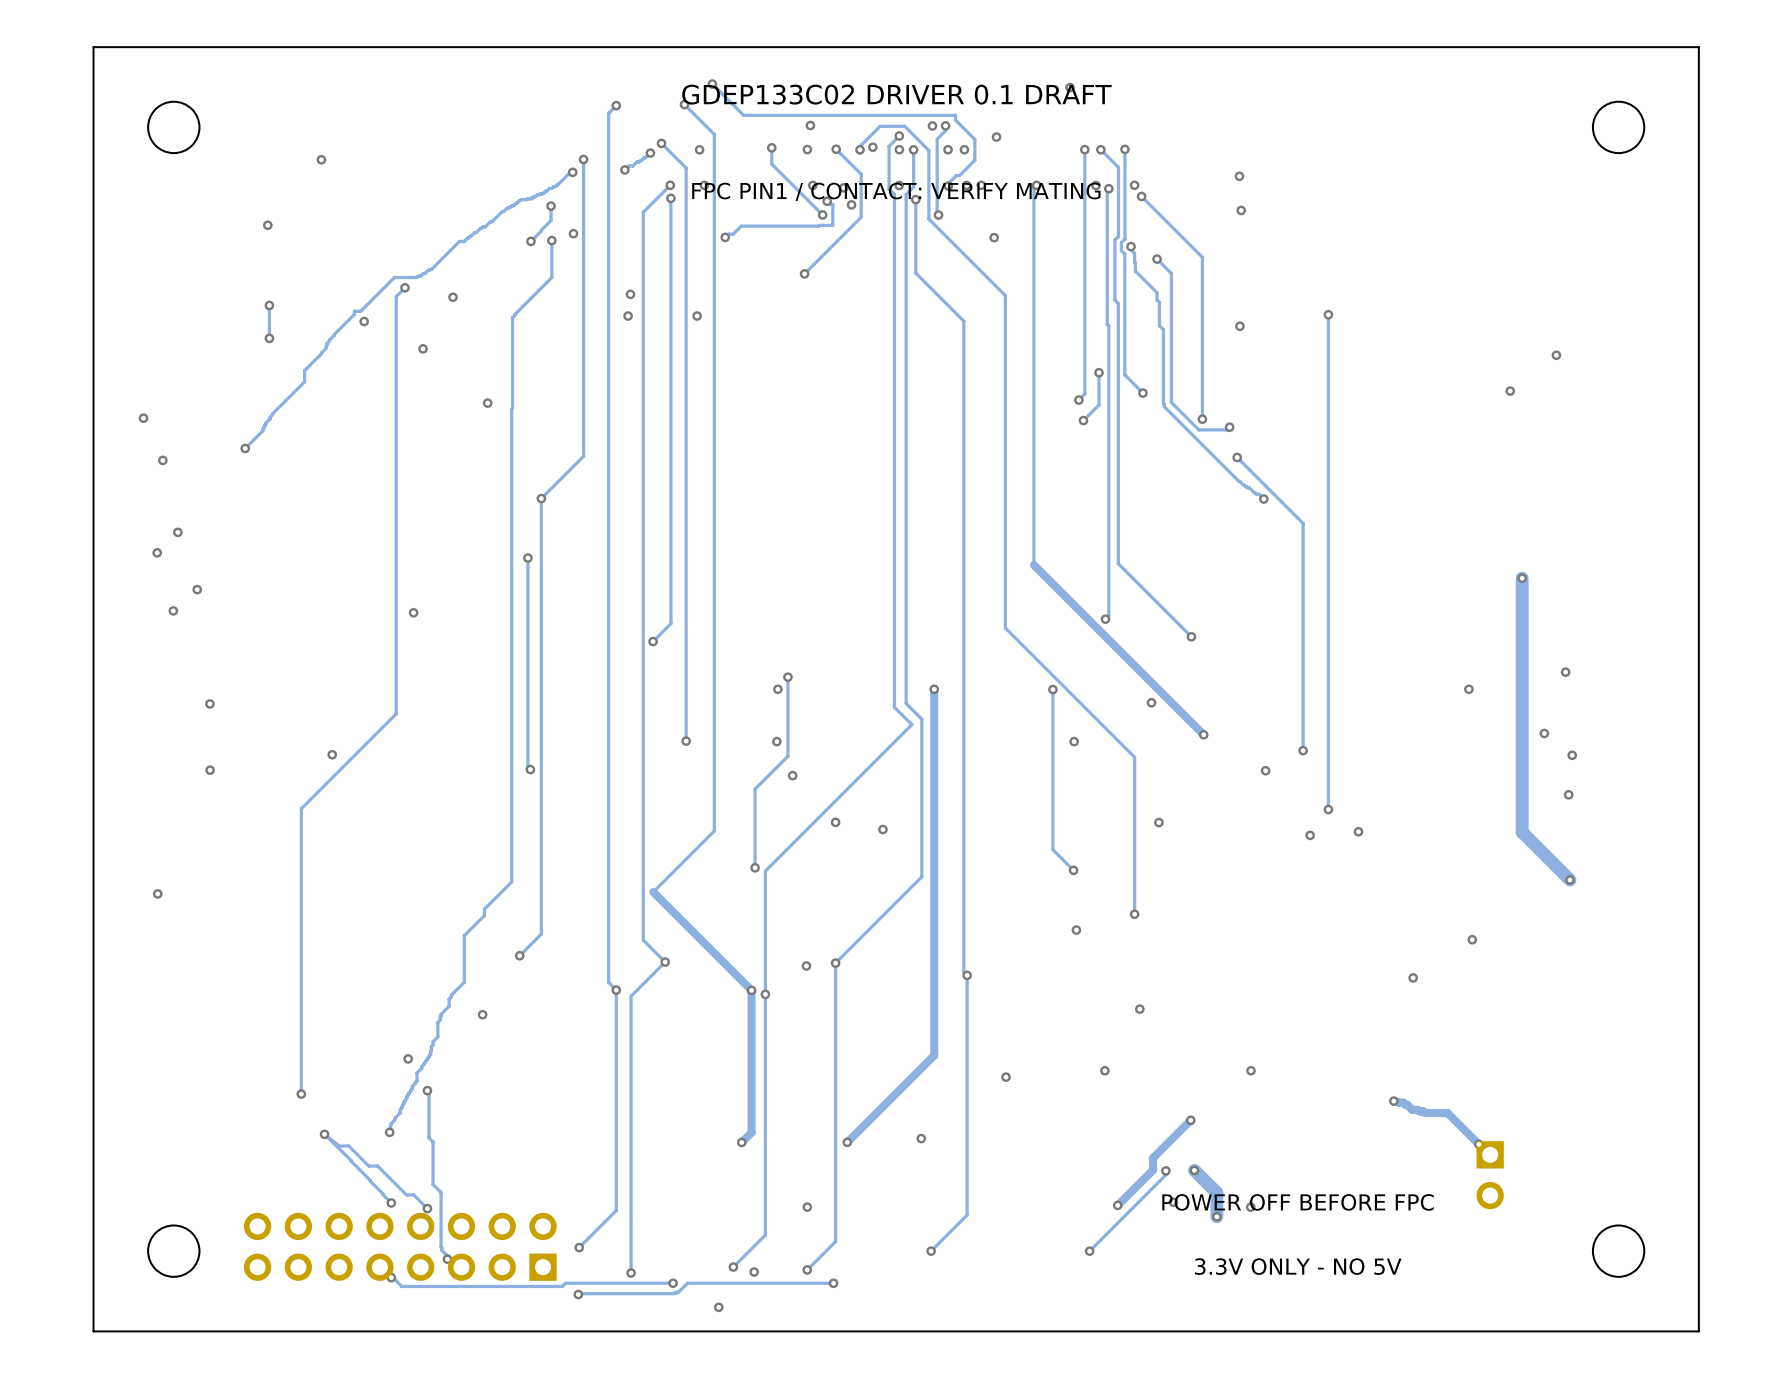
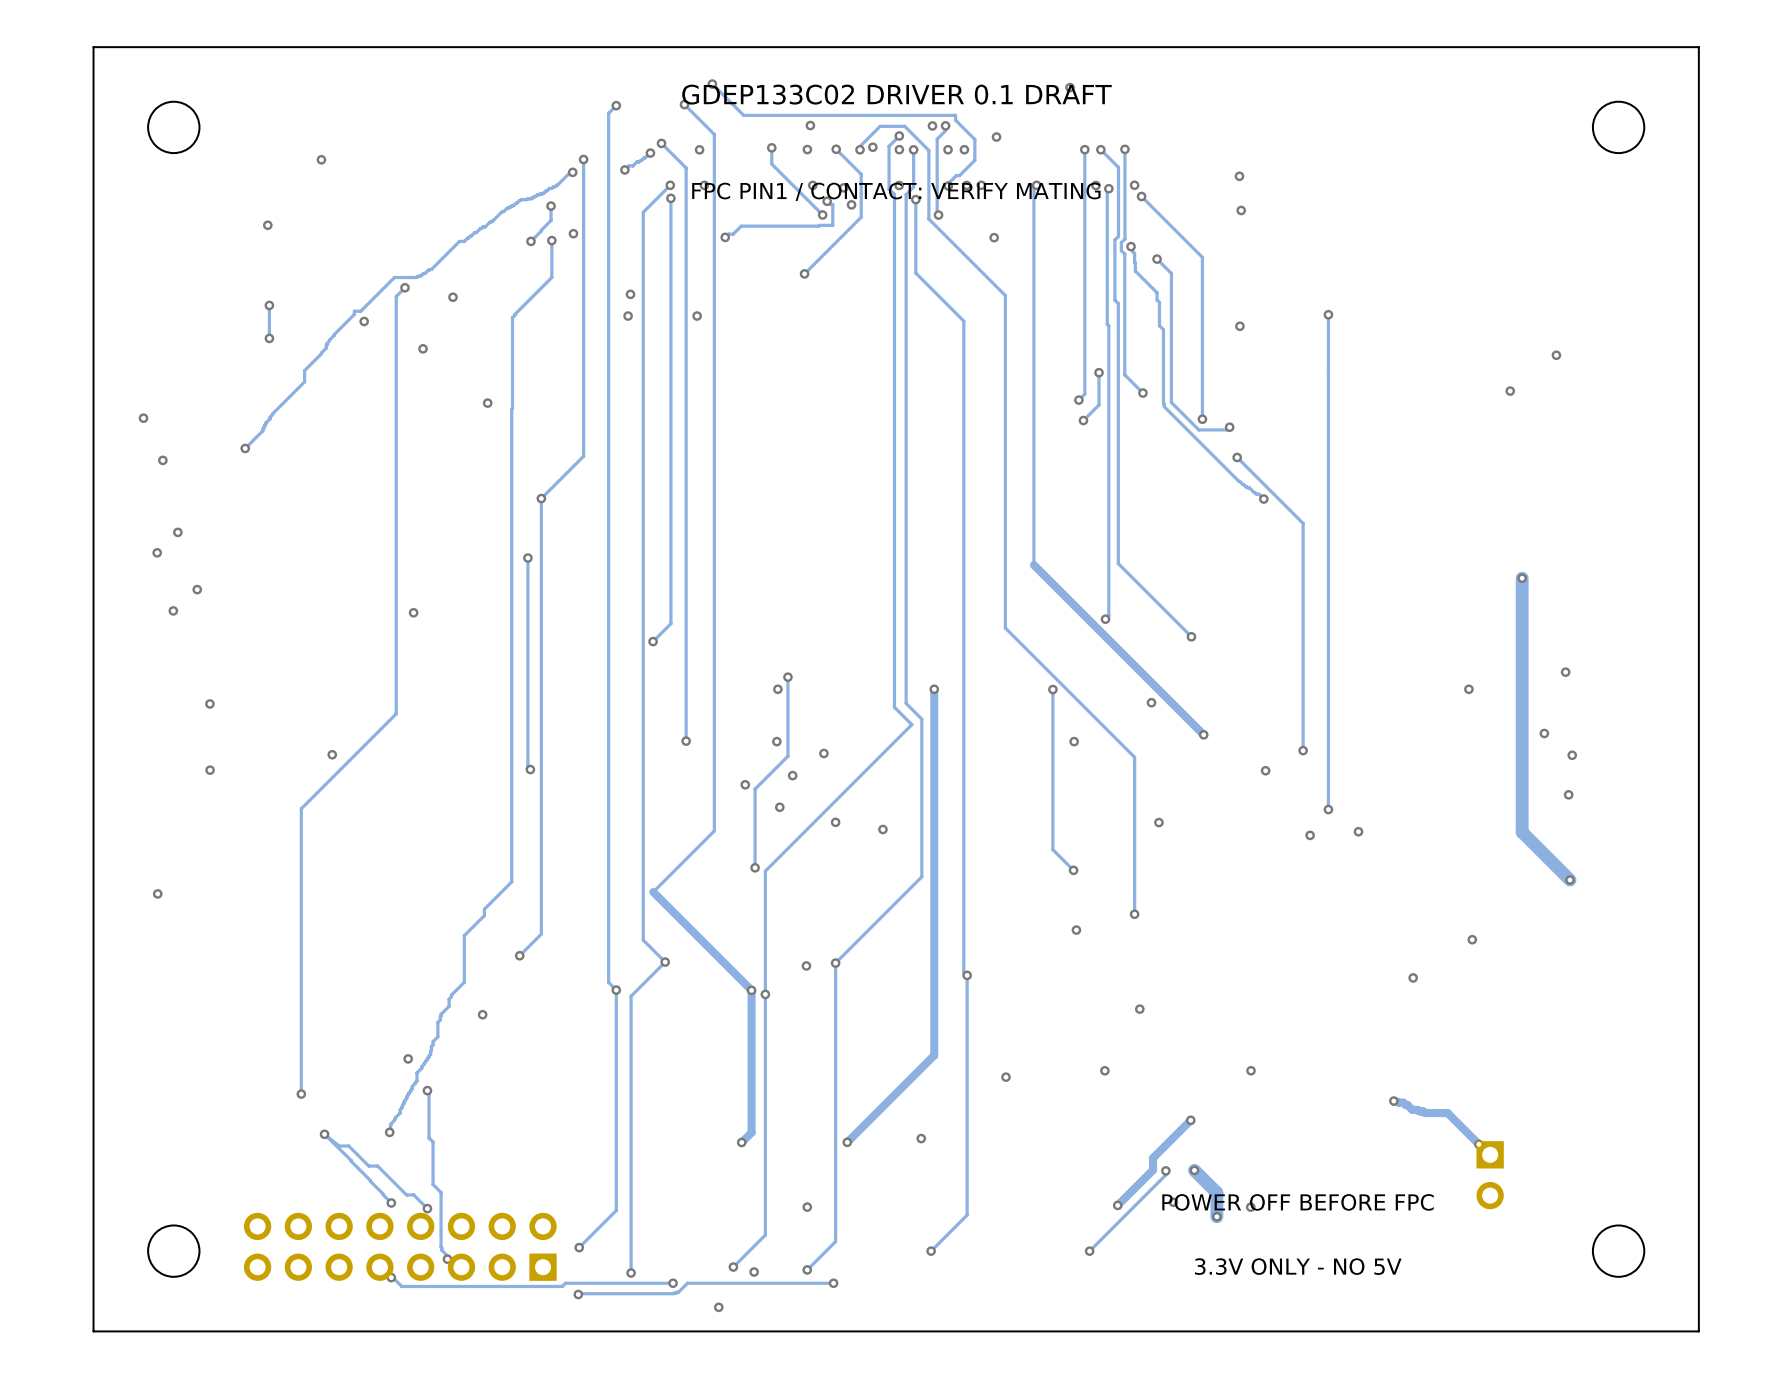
via: none -> (823, 753)
via: none -> (745, 784)
via: none -> (779, 807)

